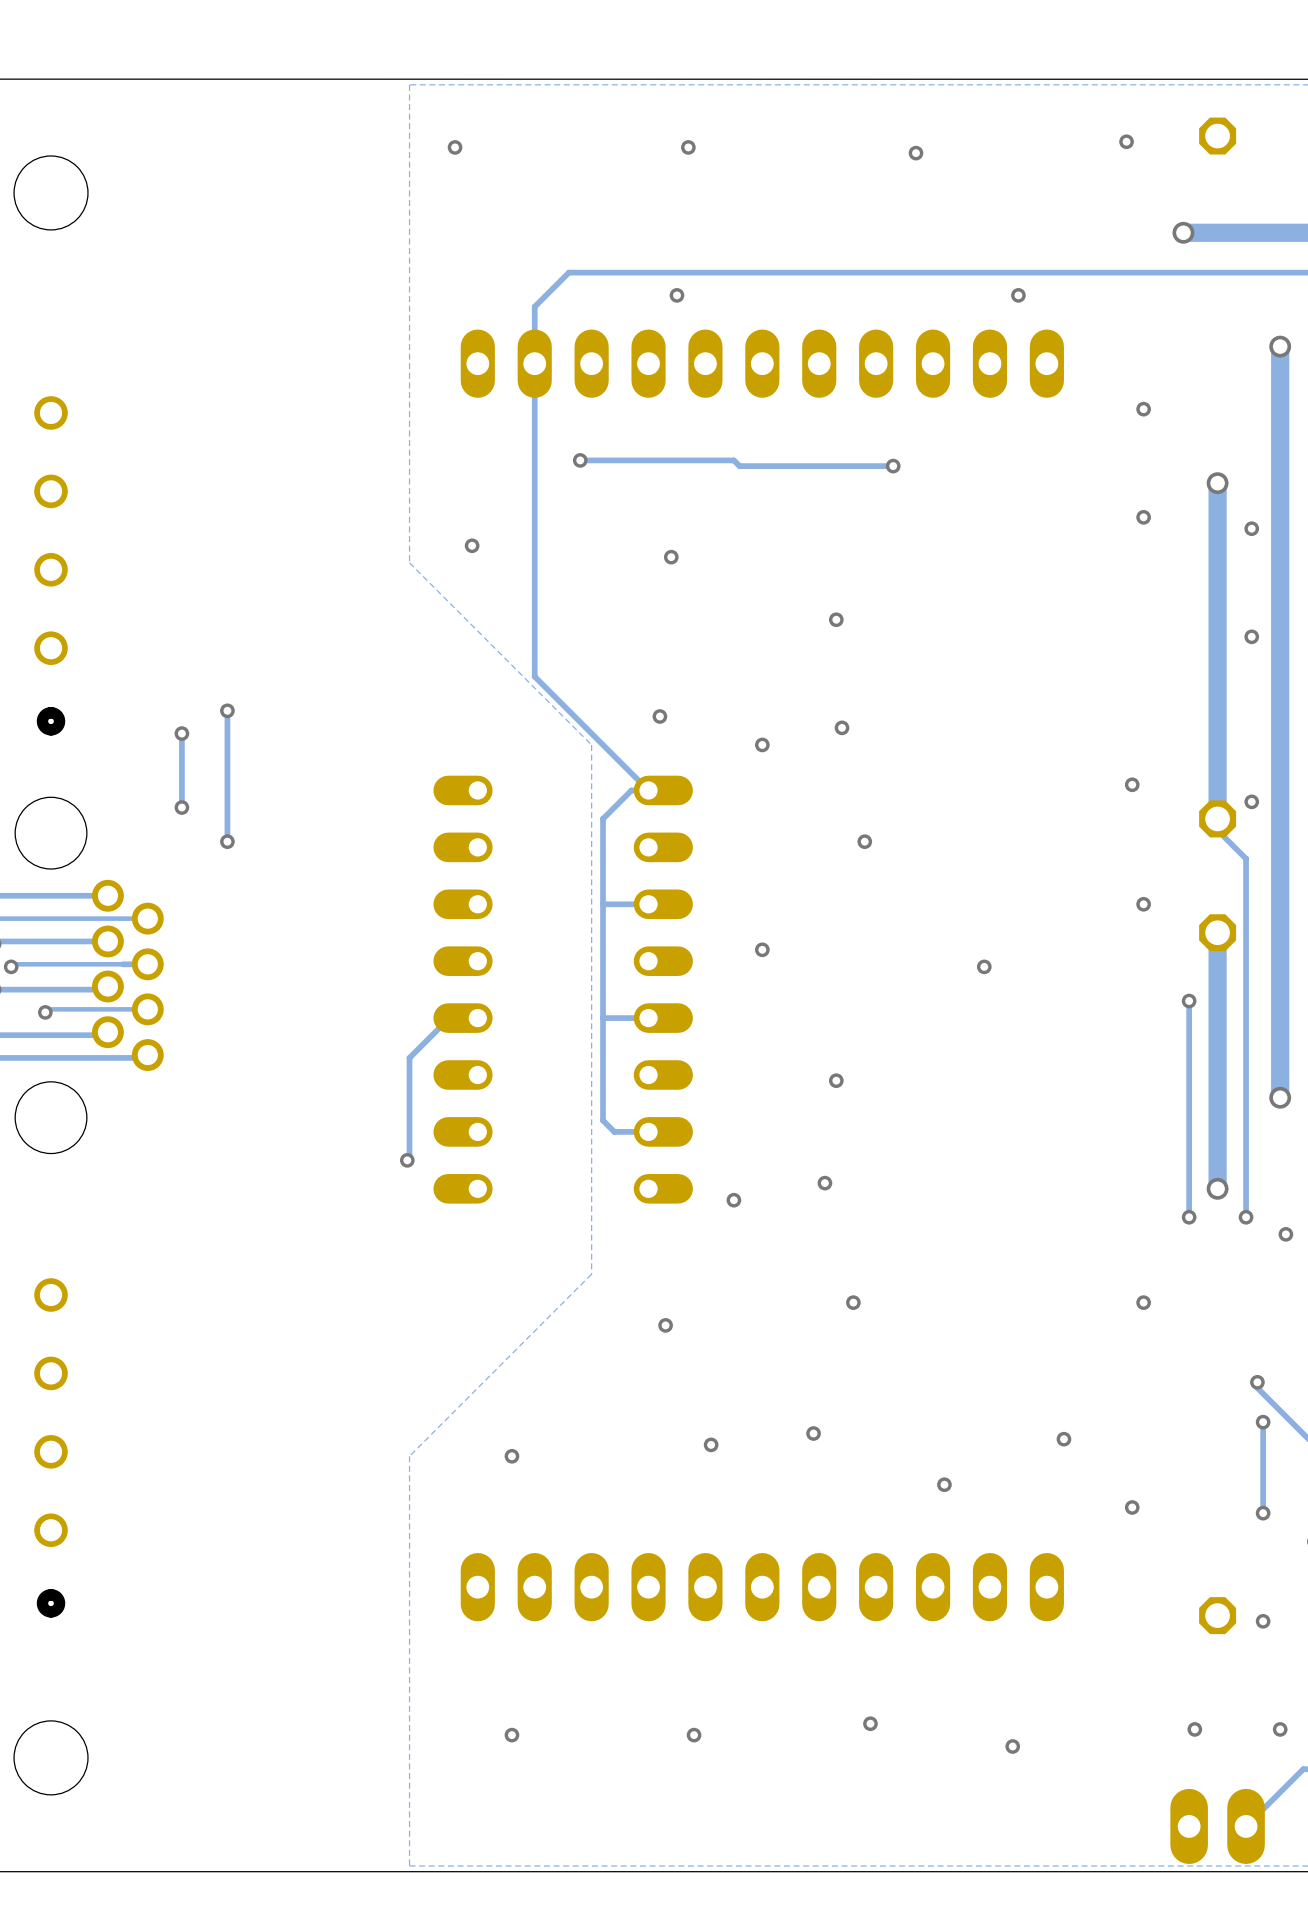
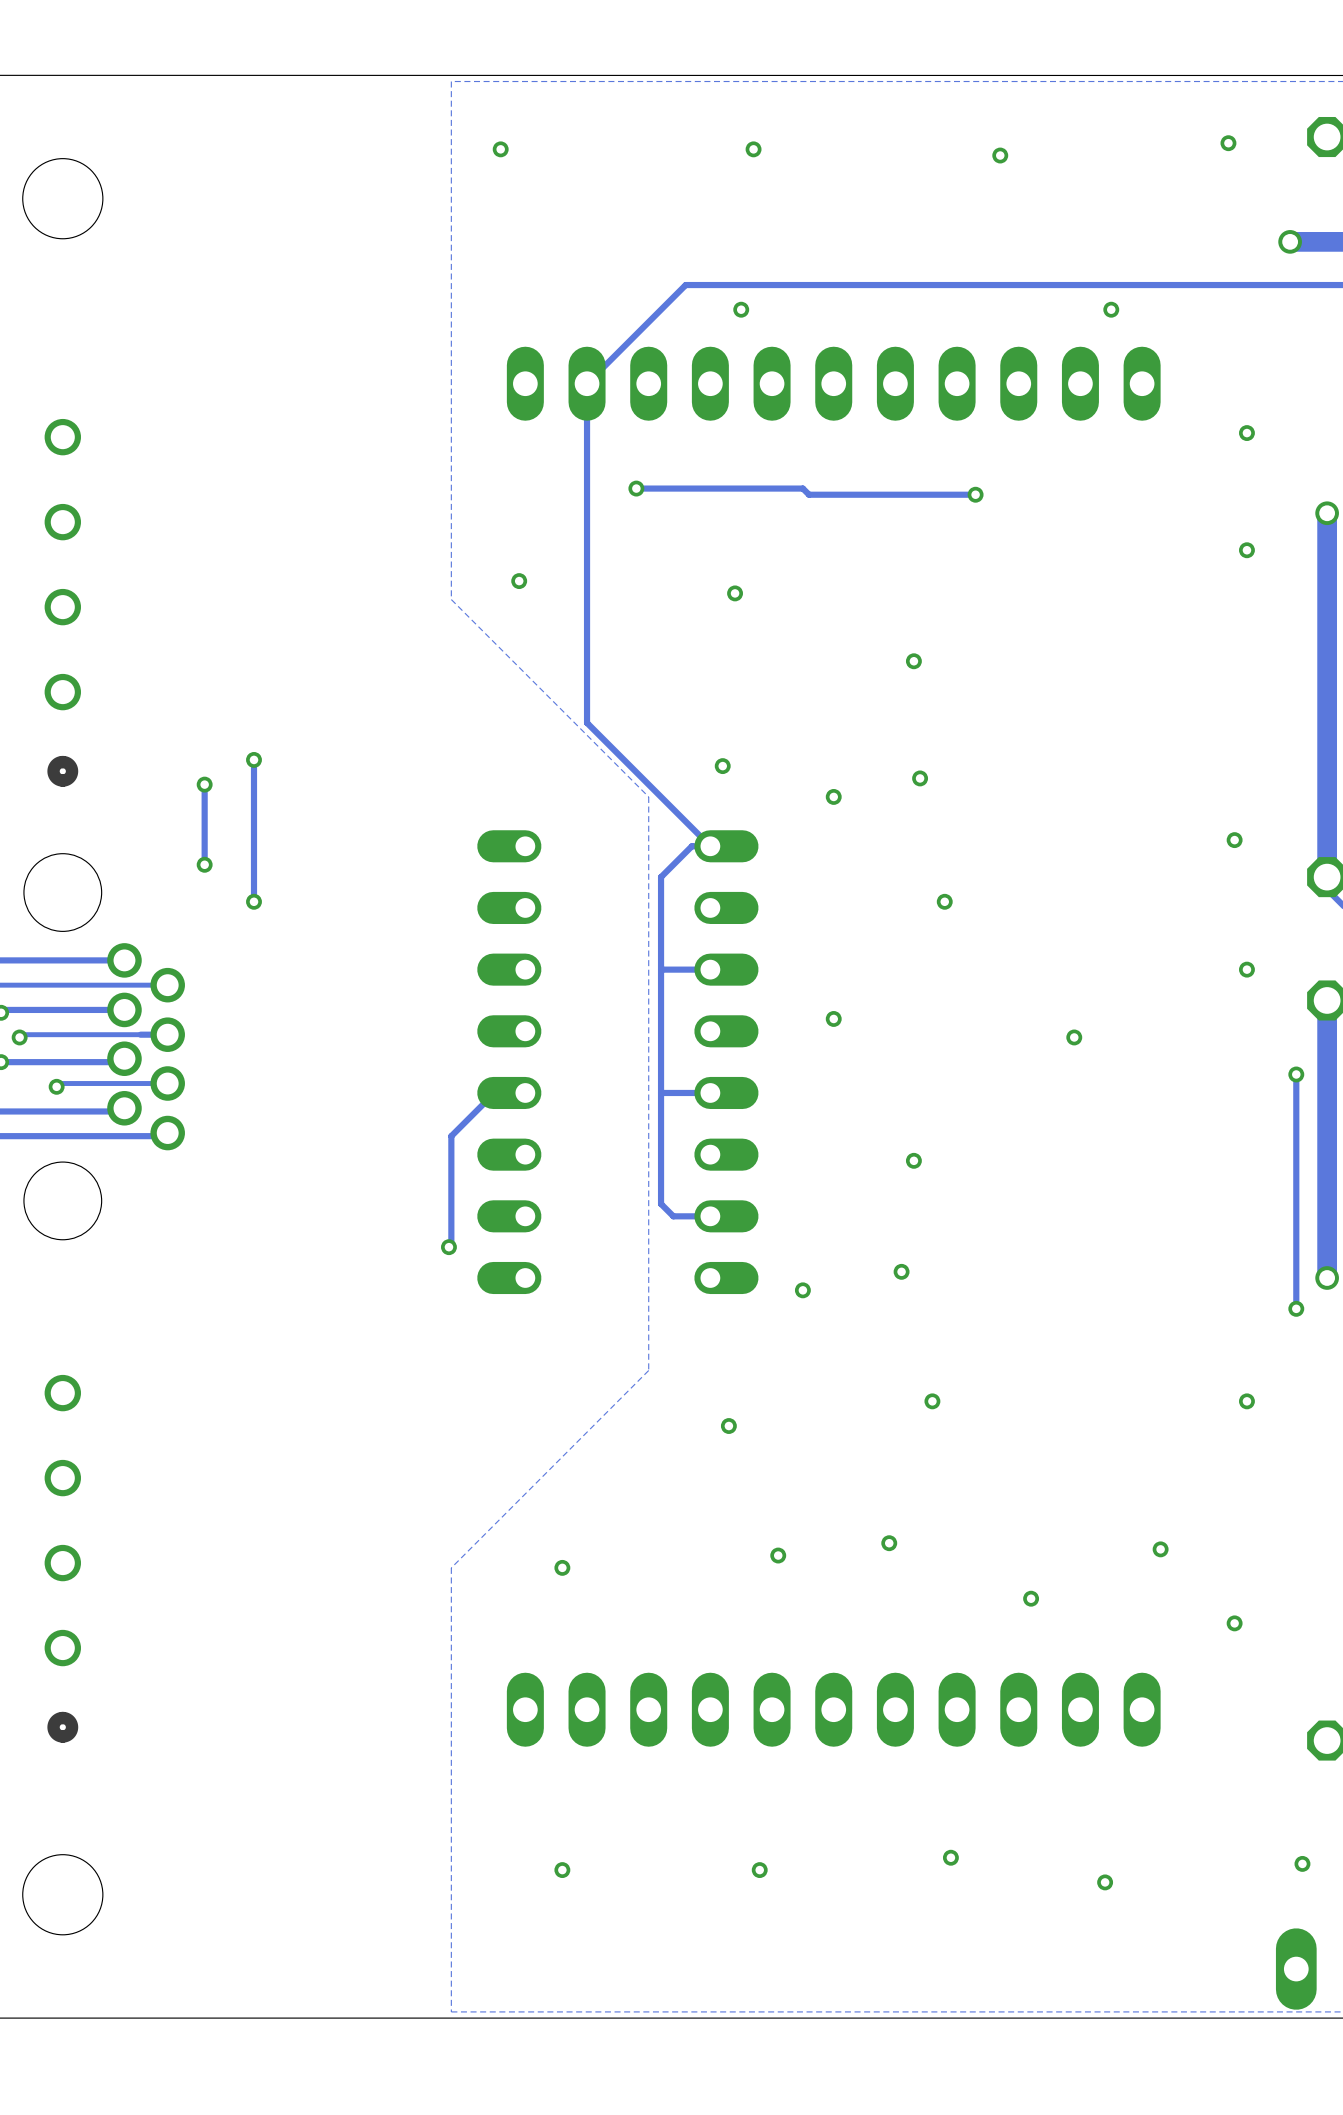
track: (625, 272) (568, 272) (534, 306) (534, 363) -> (685, 285) (587, 383)

